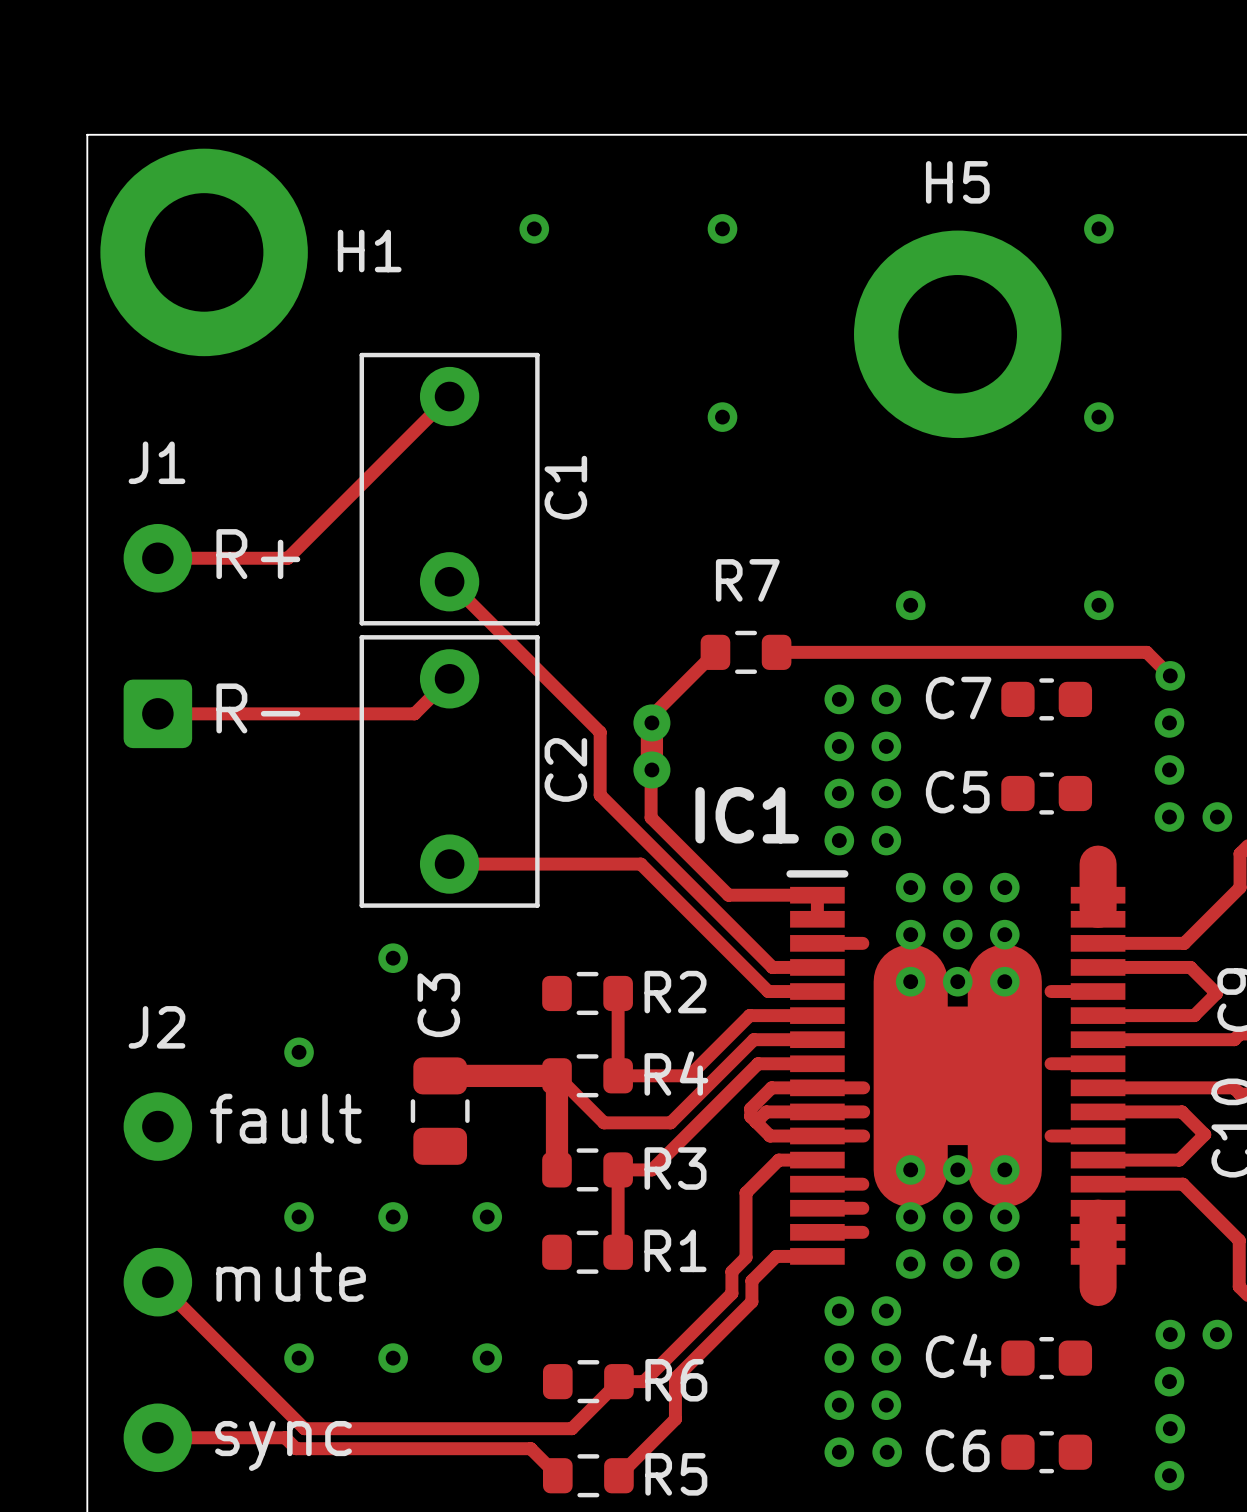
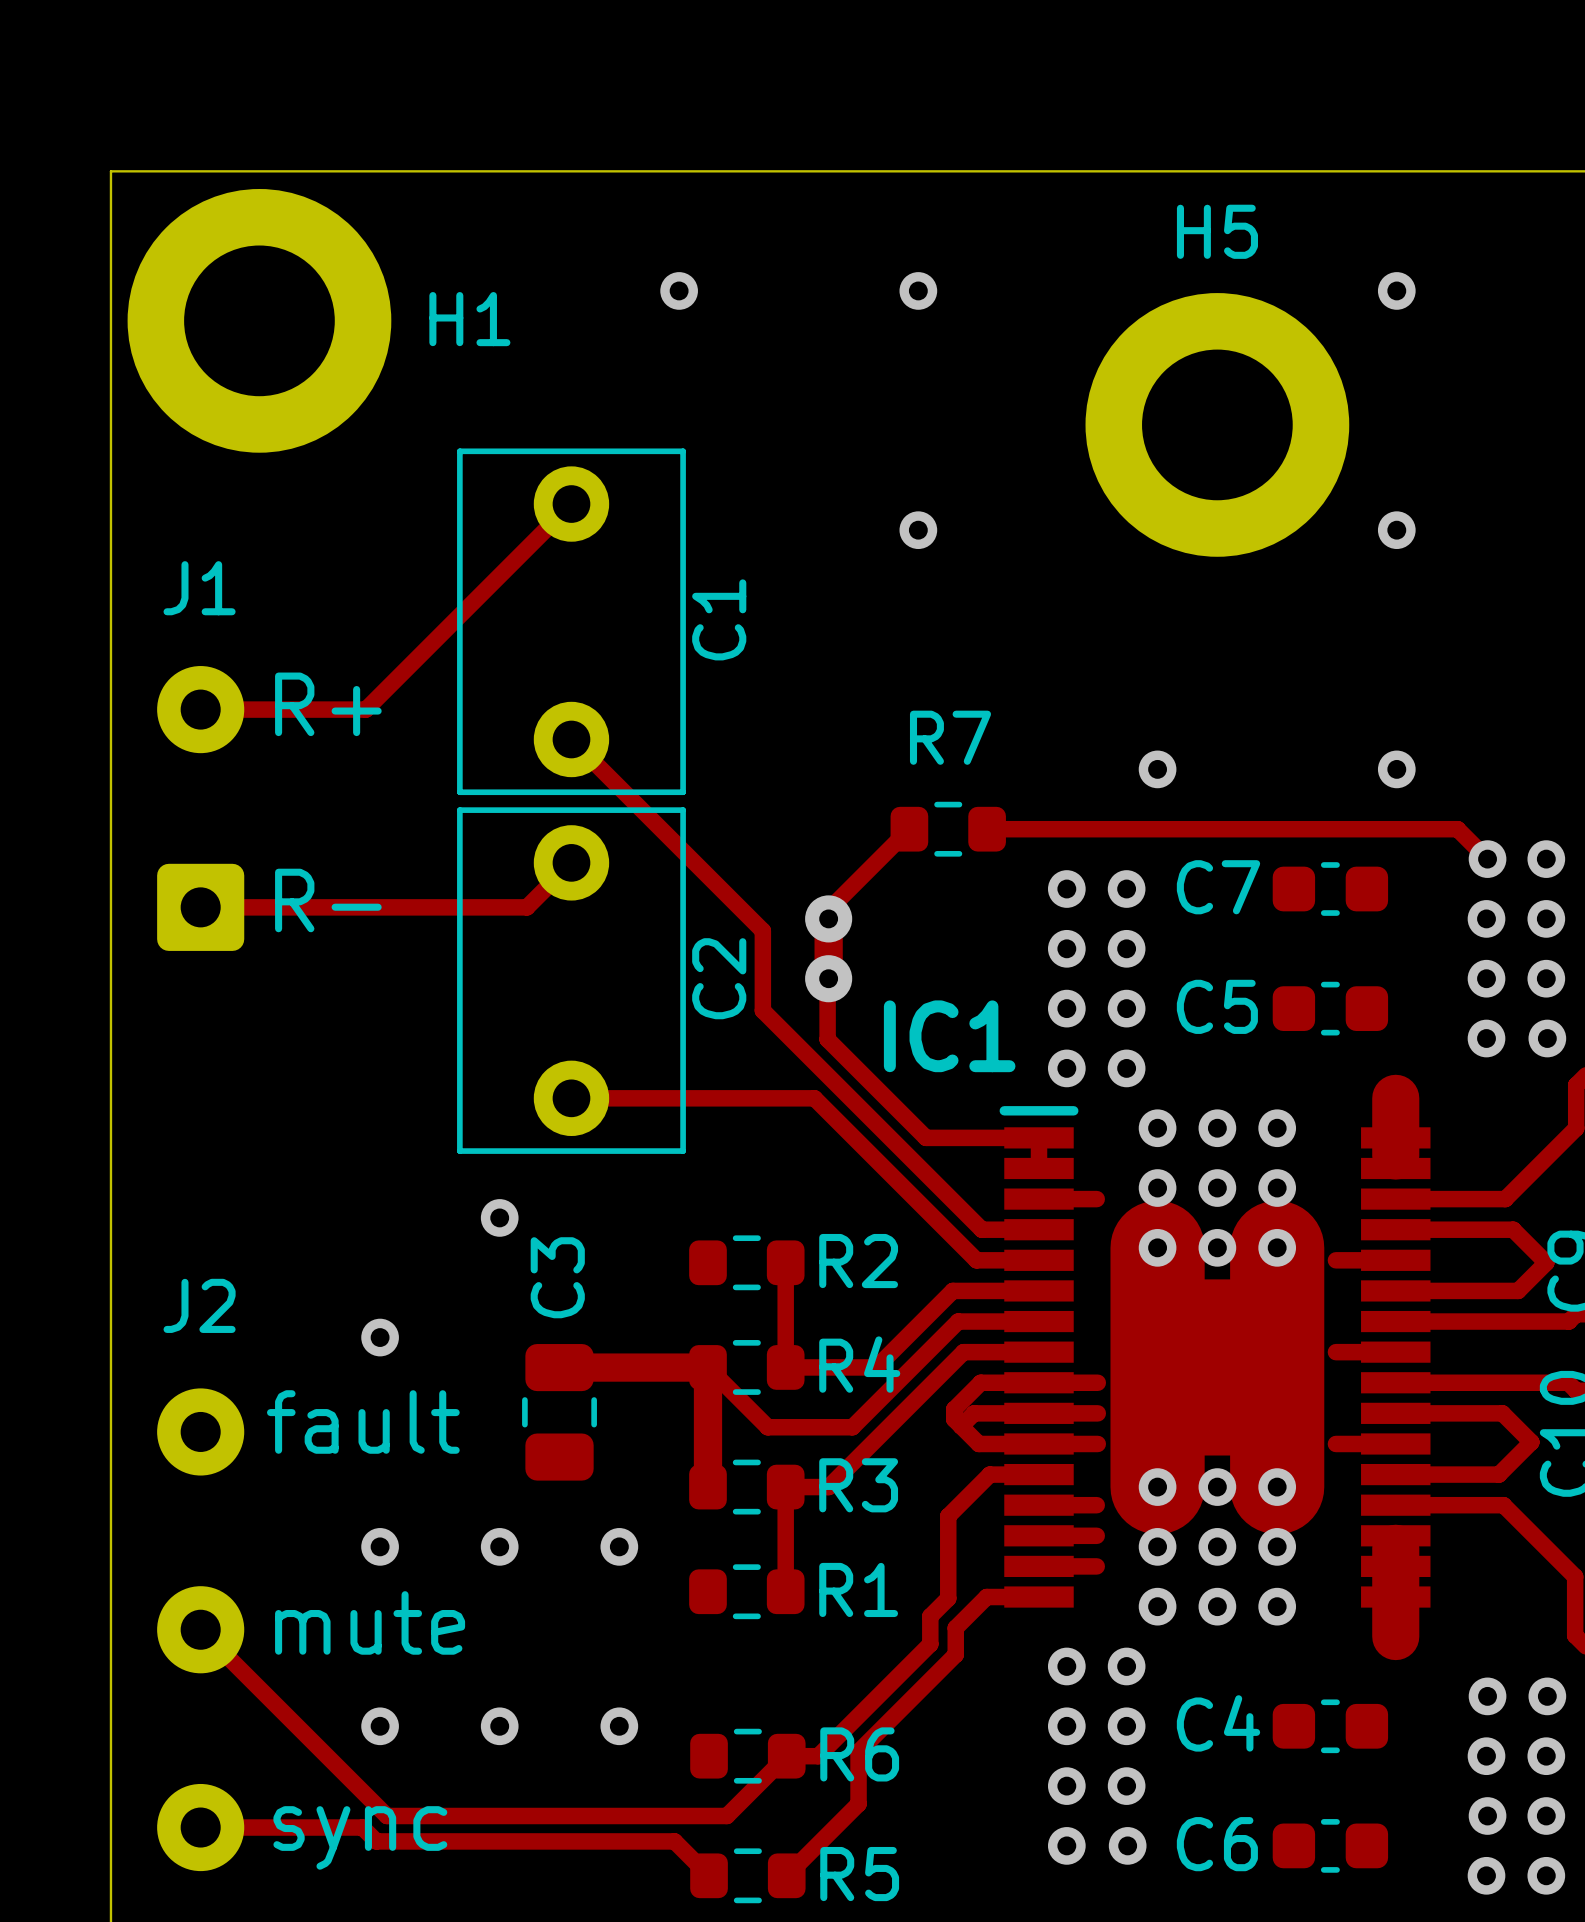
via: none -> (1546, 859)
via: none -> (1546, 918)
via: none -> (1546, 978)
via: none -> (1546, 1756)
via: none -> (1546, 1815)
via: none -> (1546, 1875)

